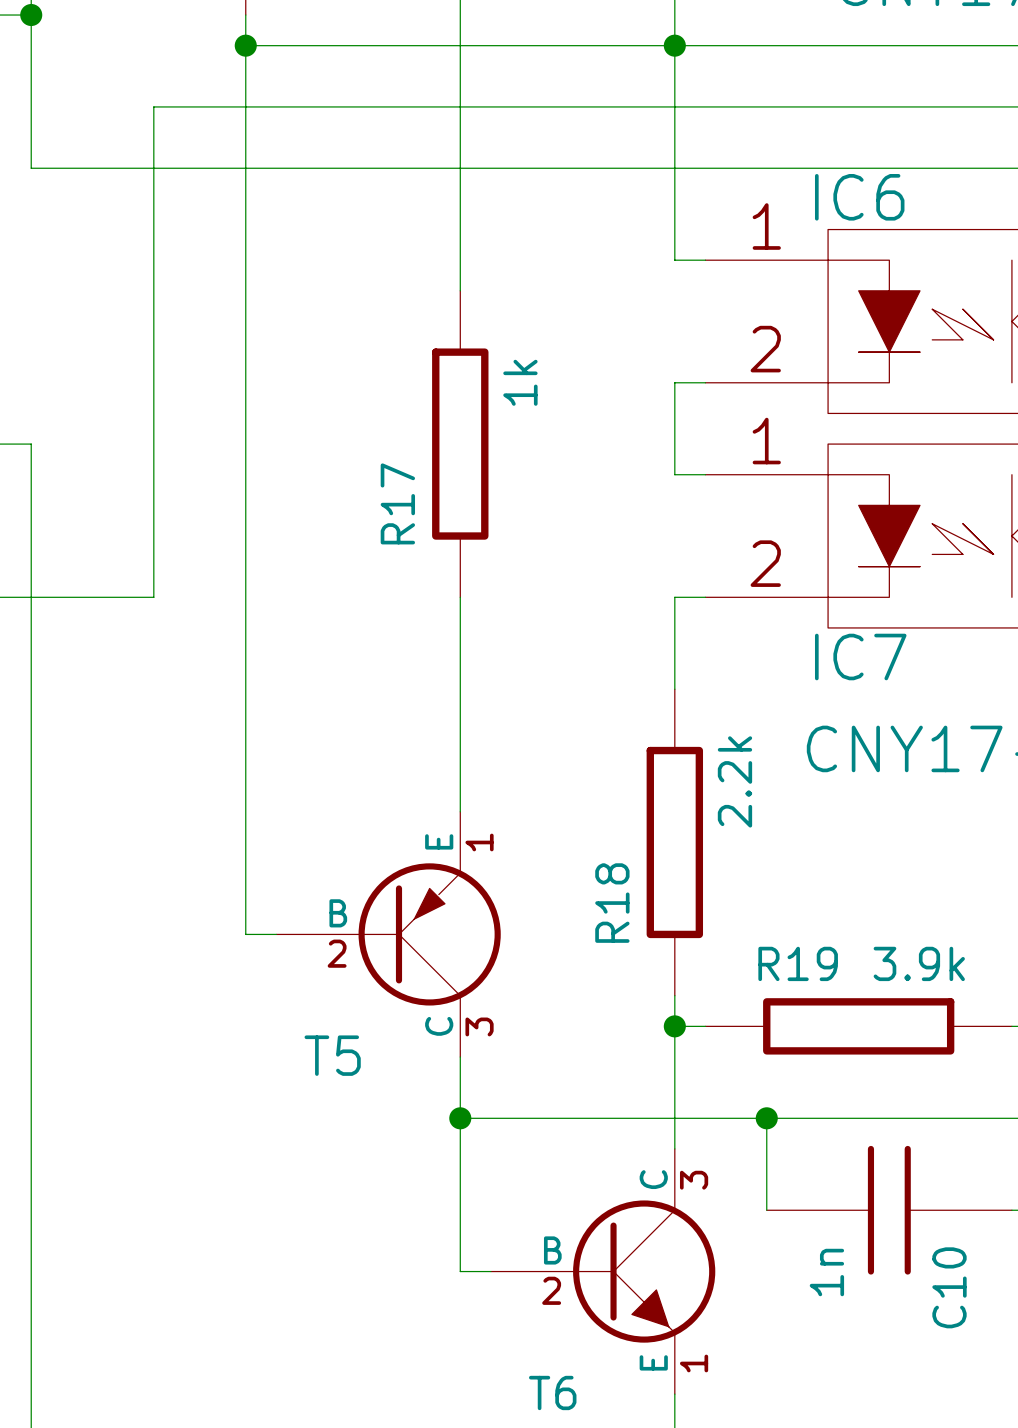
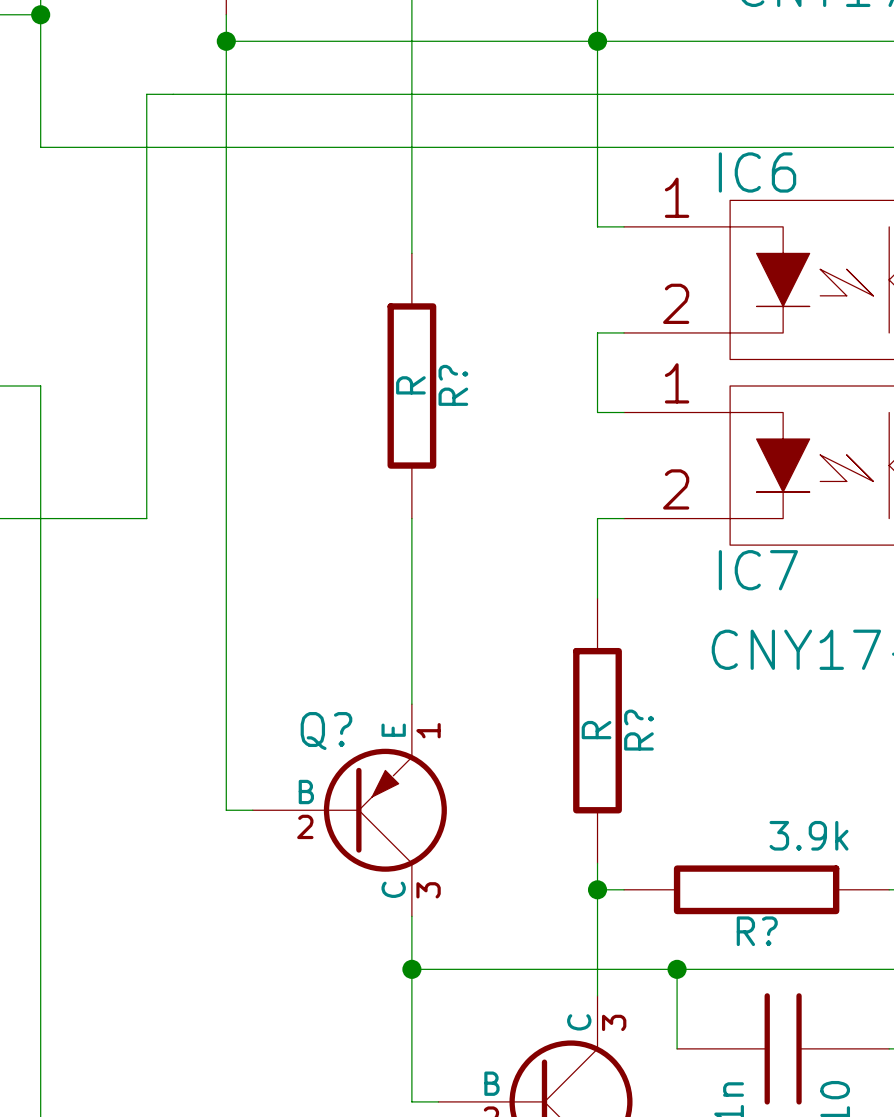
R17 value: 1k (520, 382) -> R (410, 385)
R17 name: R17 (397, 503) -> R? (453, 385)
R18 value: 2.2k (734, 781) -> R (596, 730)
R18 name: R18 (612, 903) -> R? (638, 730)
R19 name: R19 (798, 963) -> R? (757, 931)
T5 name: T5 (332, 1055) -> Q? (326, 731)

